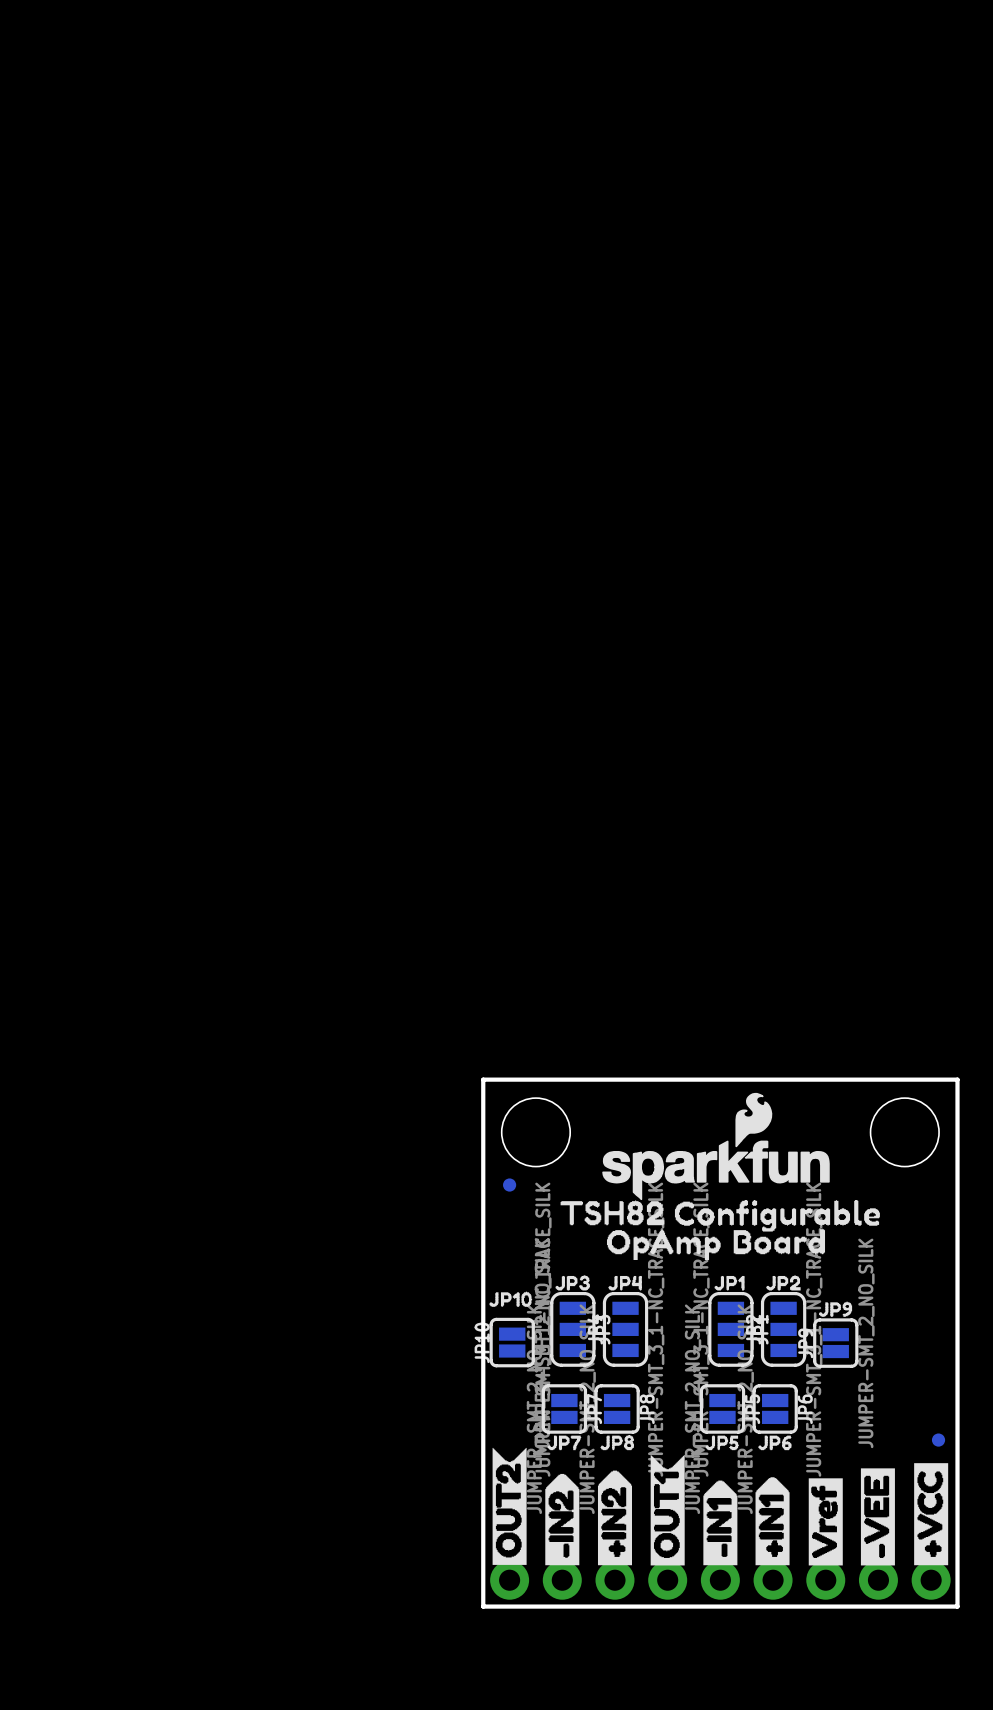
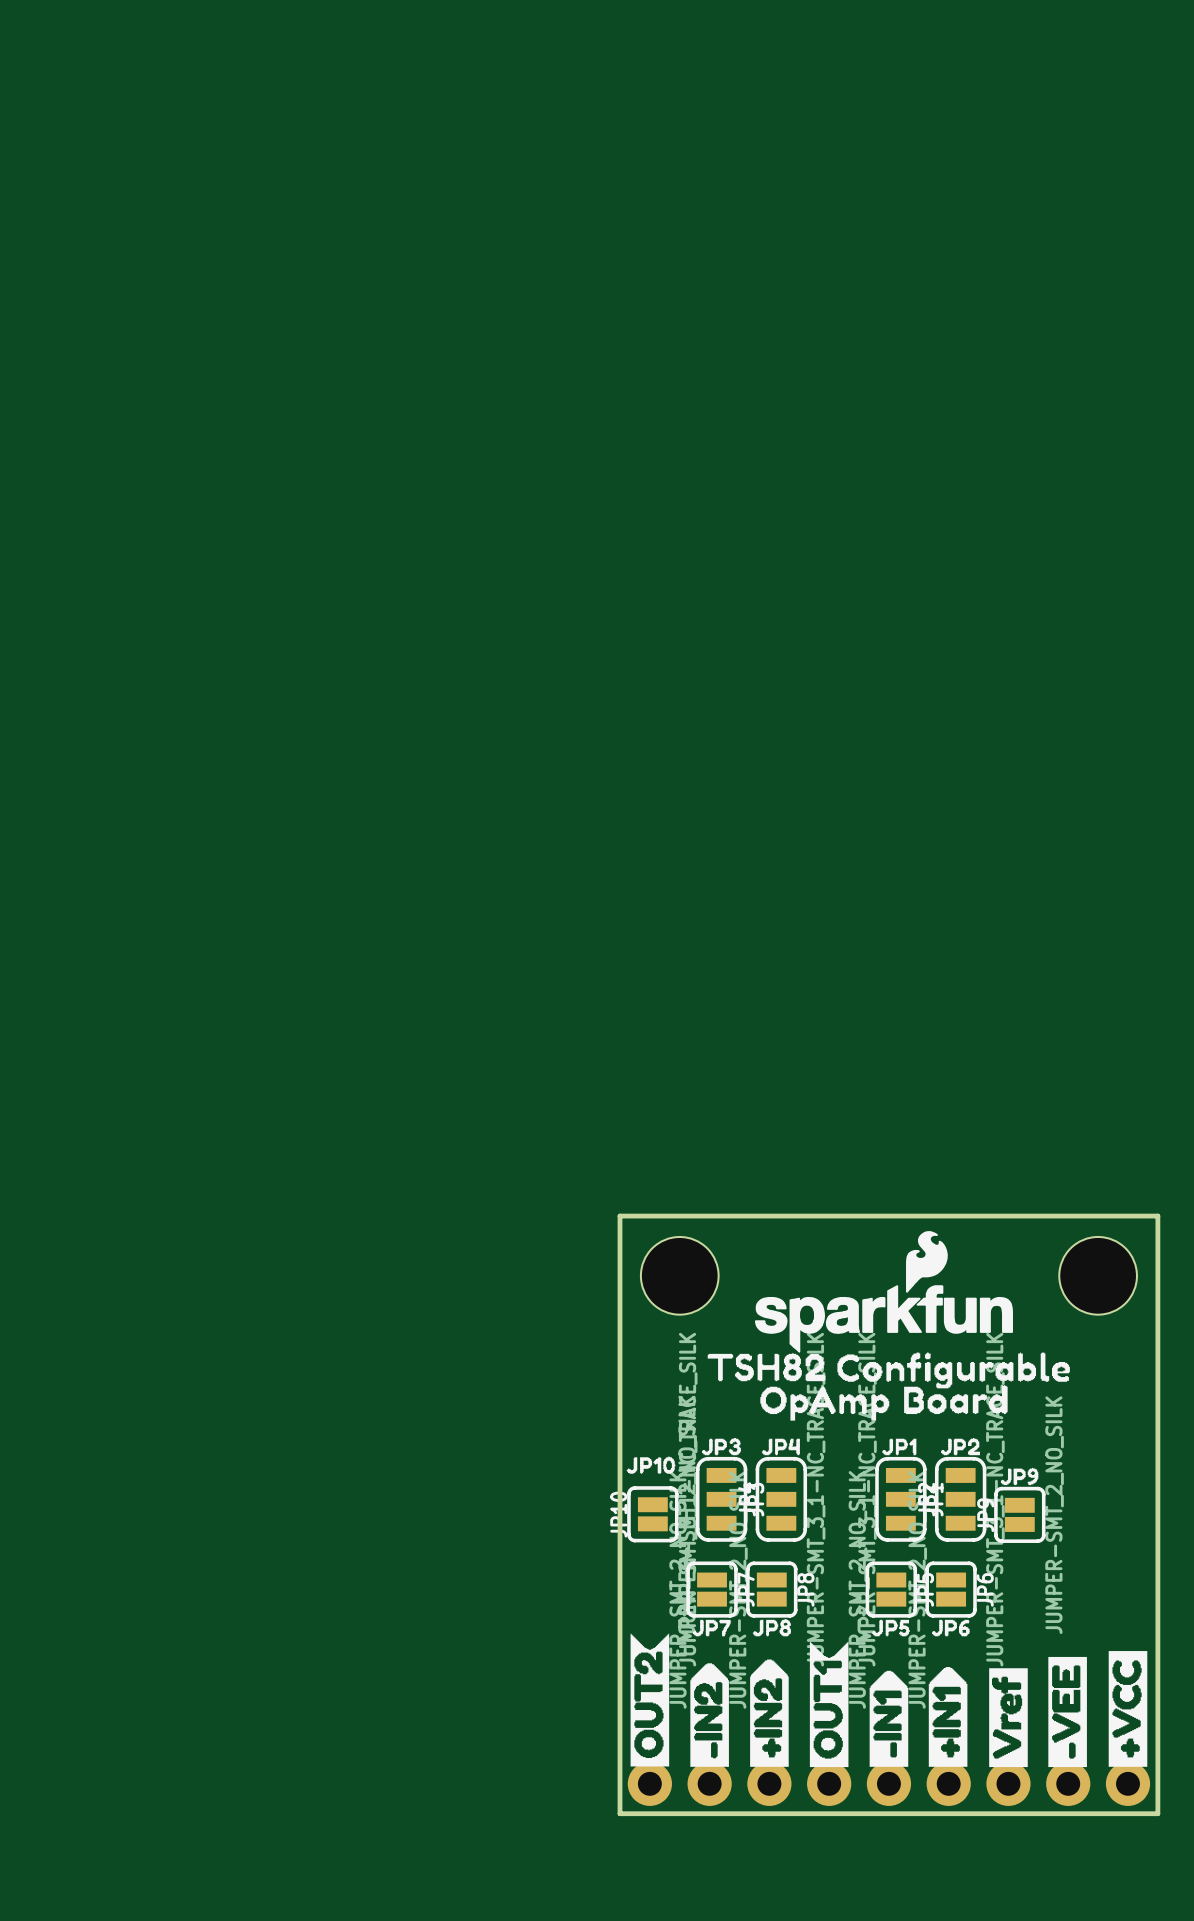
part: (509, 1185) -> none
part: (938, 1440) -> none

